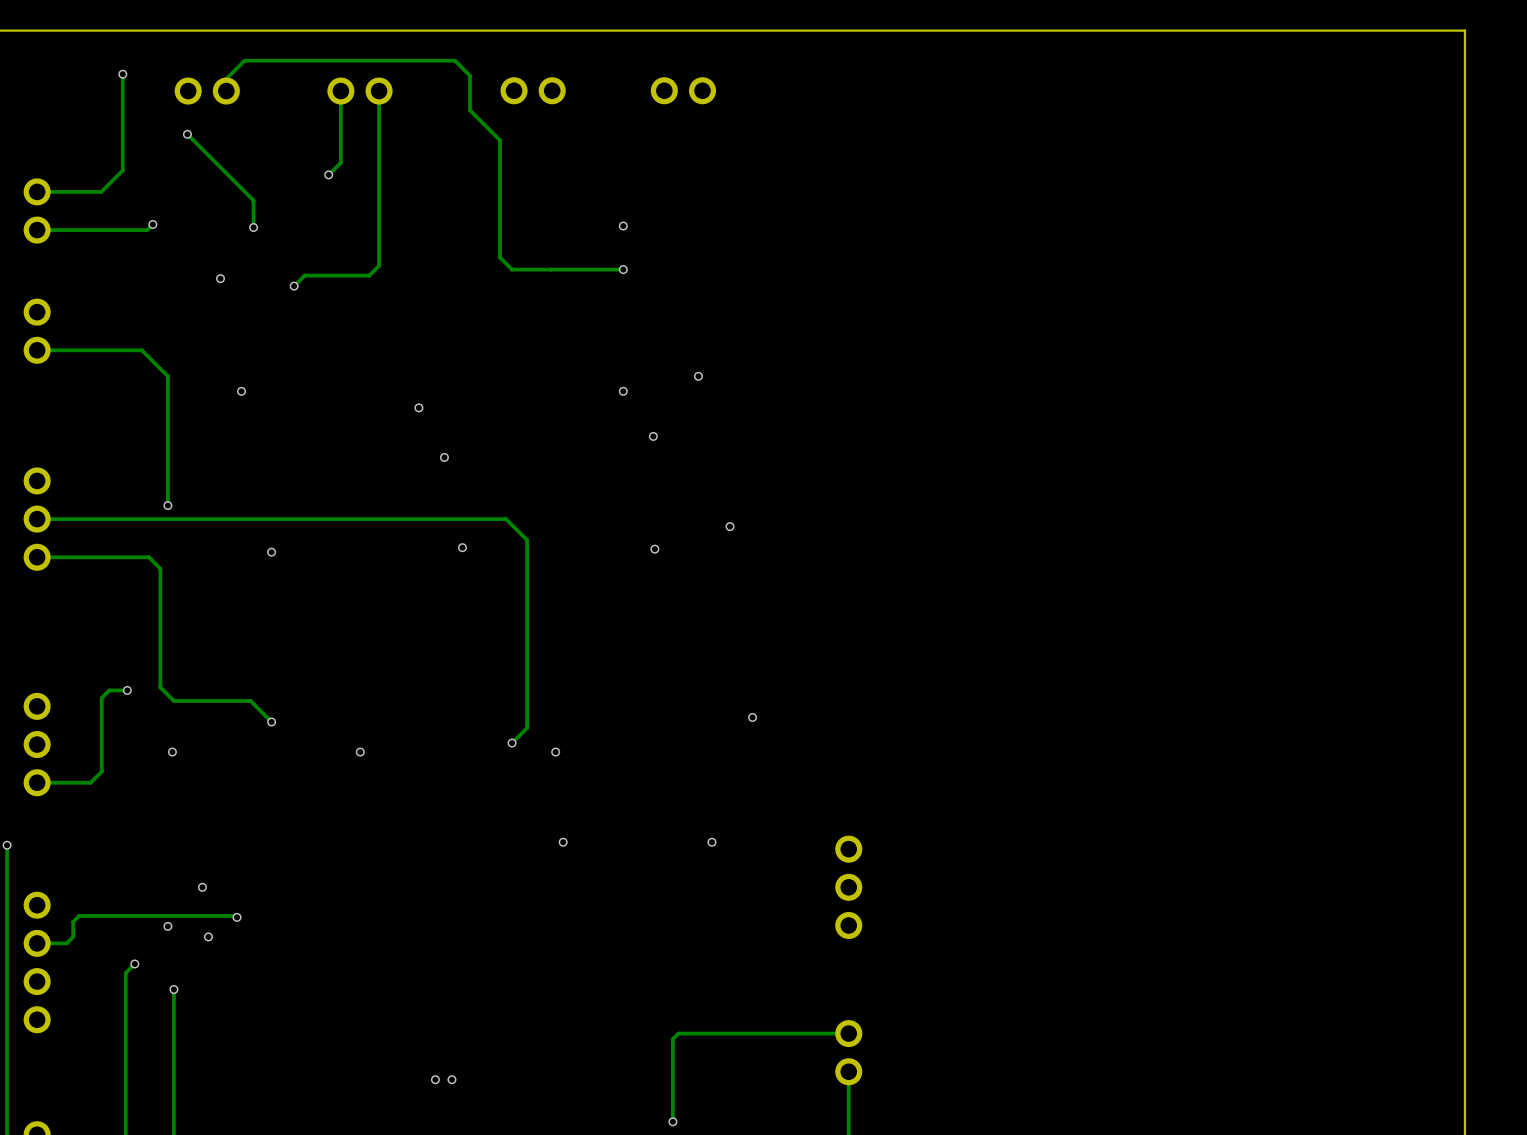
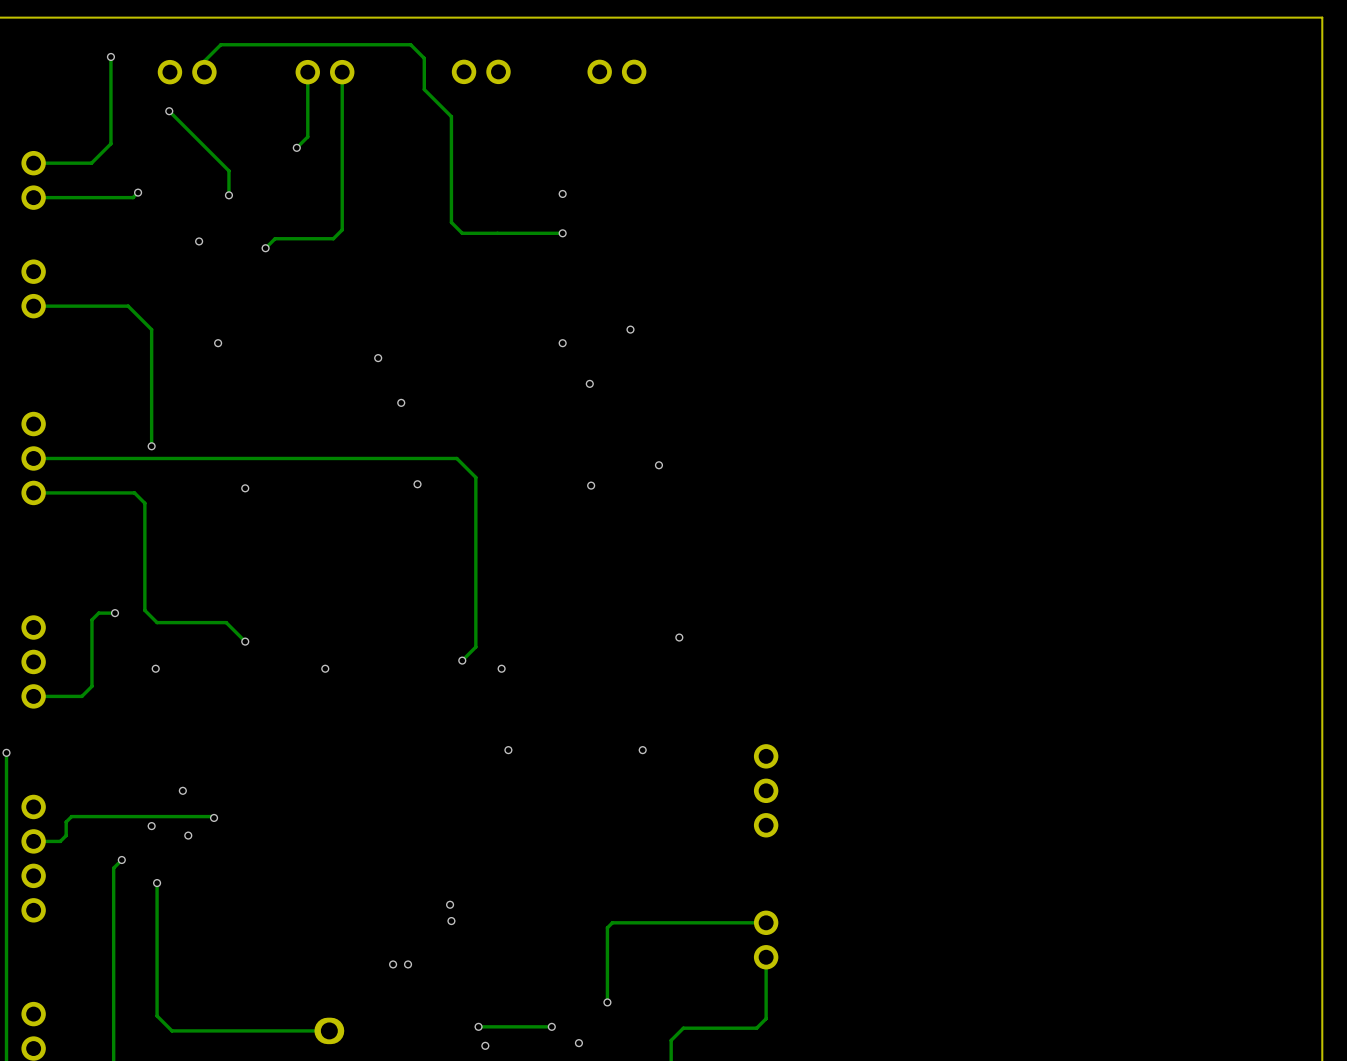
via: none -> (450, 904)
via: none -> (451, 921)

